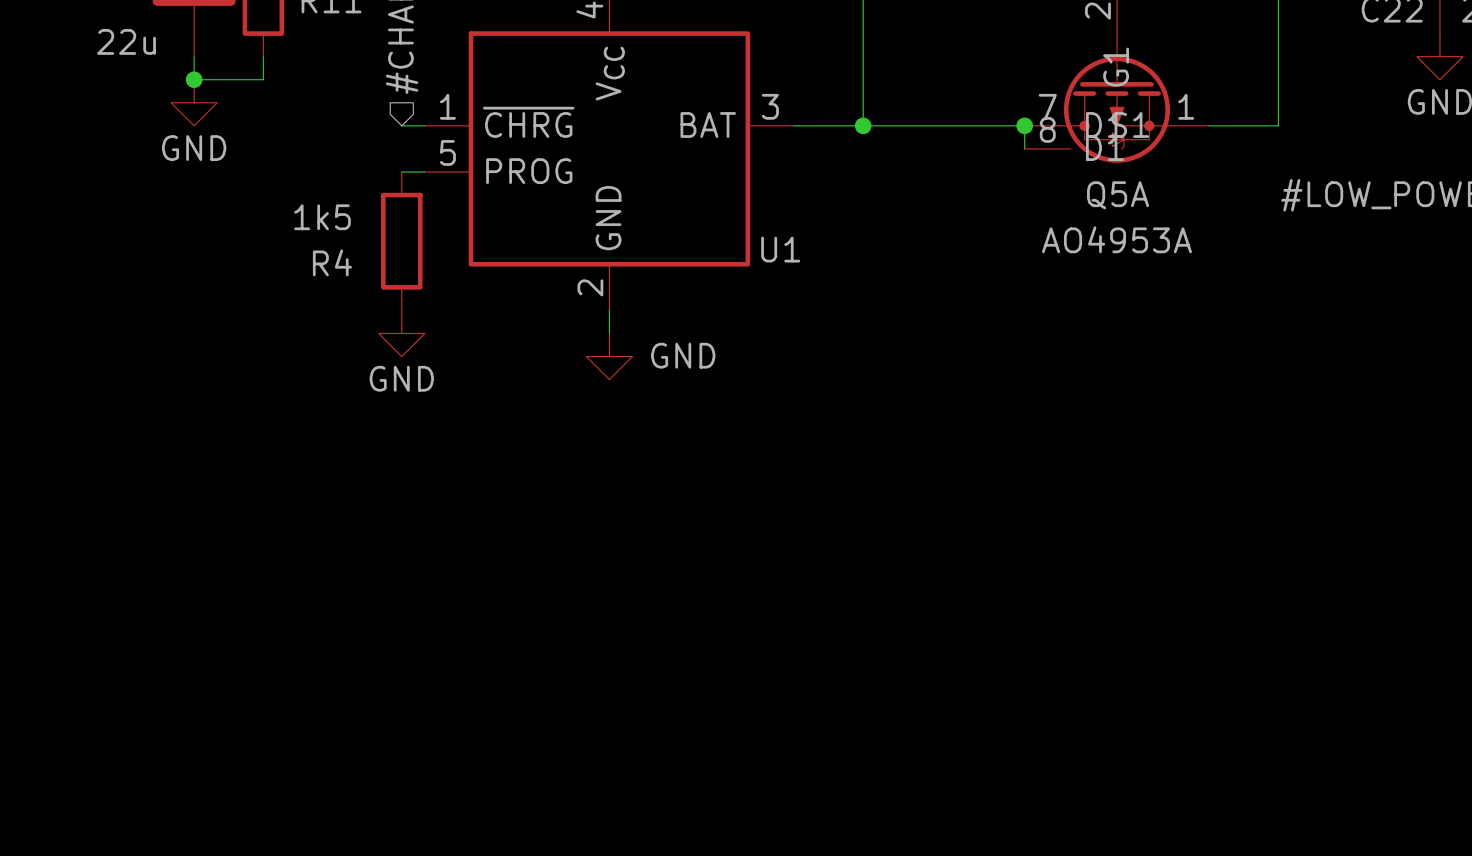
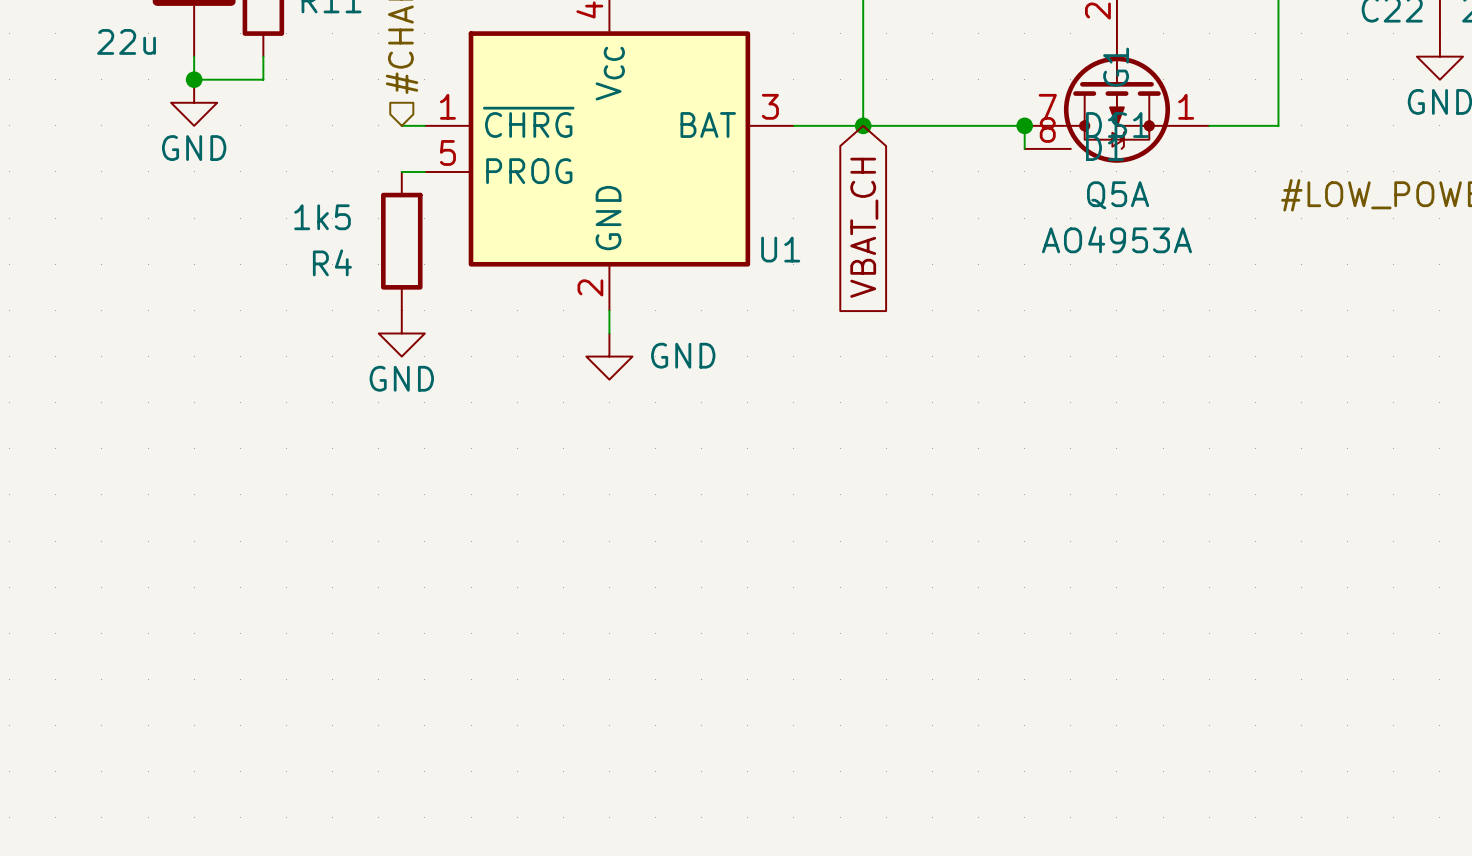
global label: none -> VBAT_CH (864, 227)

